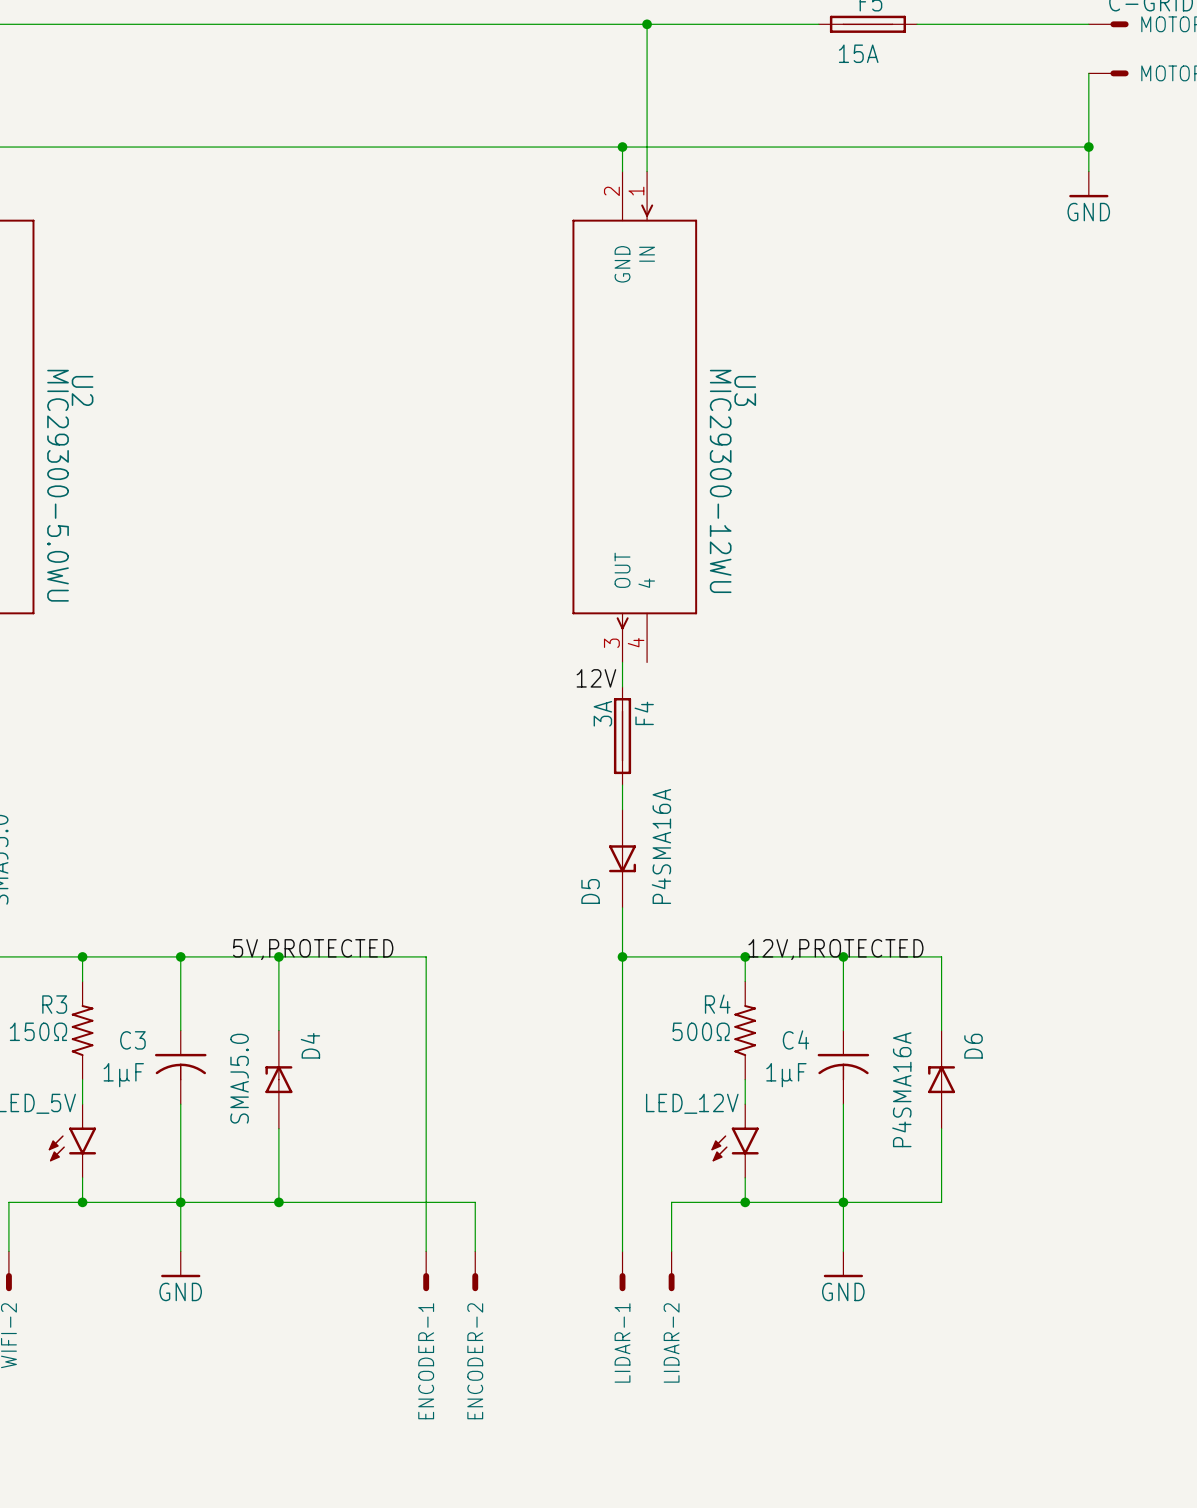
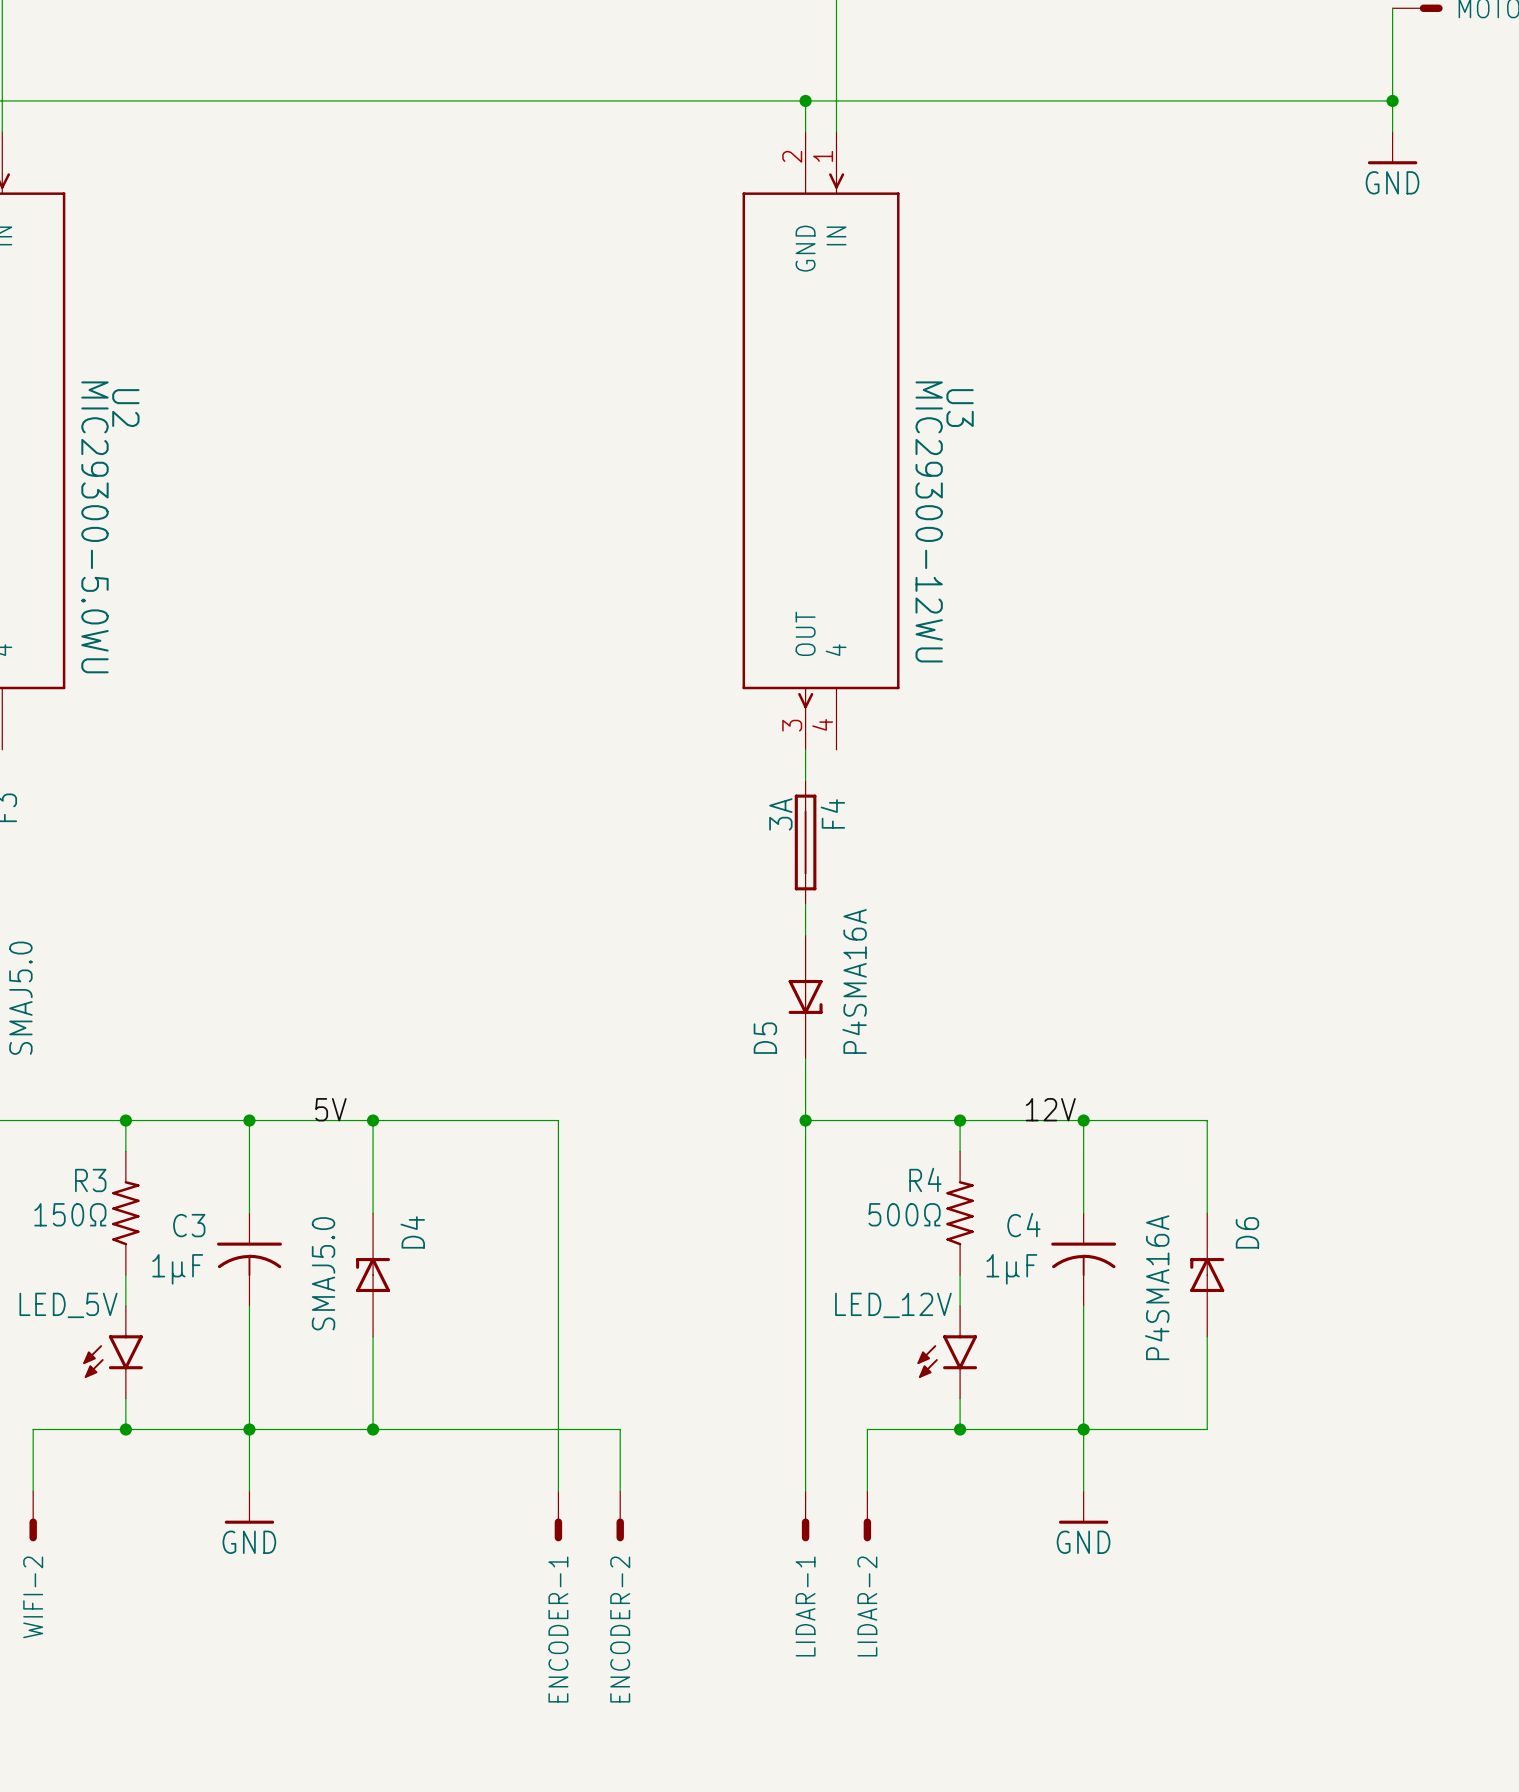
label: 12V (596, 678) -> none
label: none -> 12V (1050, 1109)
label: 5V,PROTECTED (313, 949) -> 5V (330, 1109)
label: 12V,PROTECTED (835, 949) -> none

